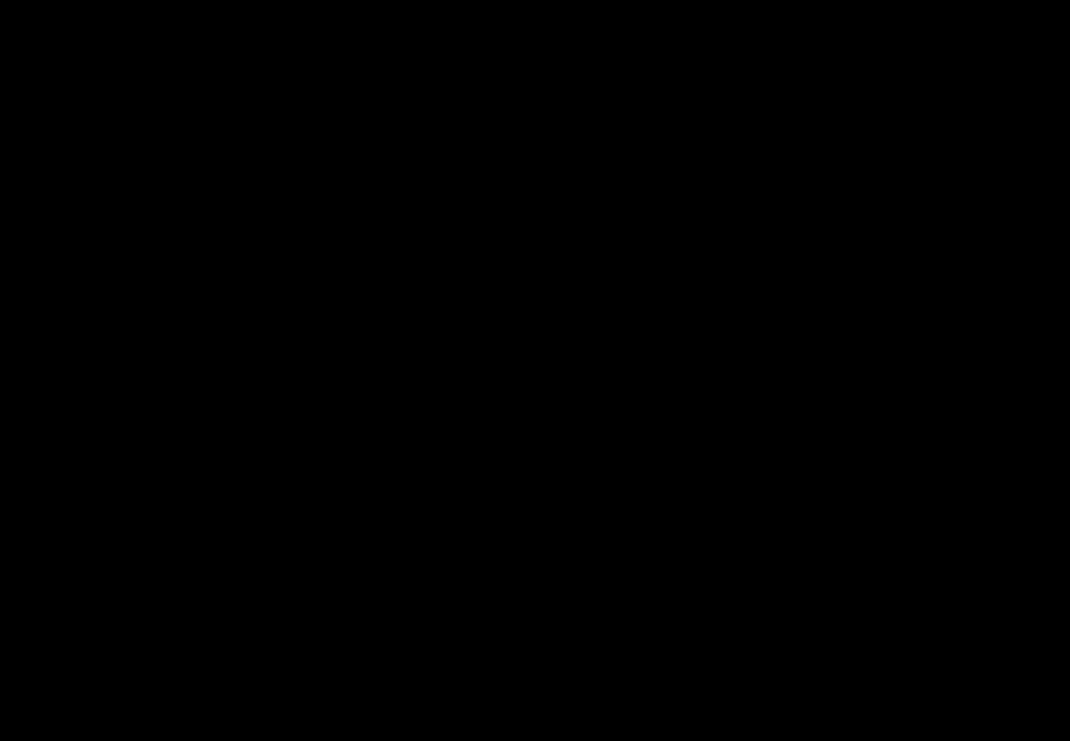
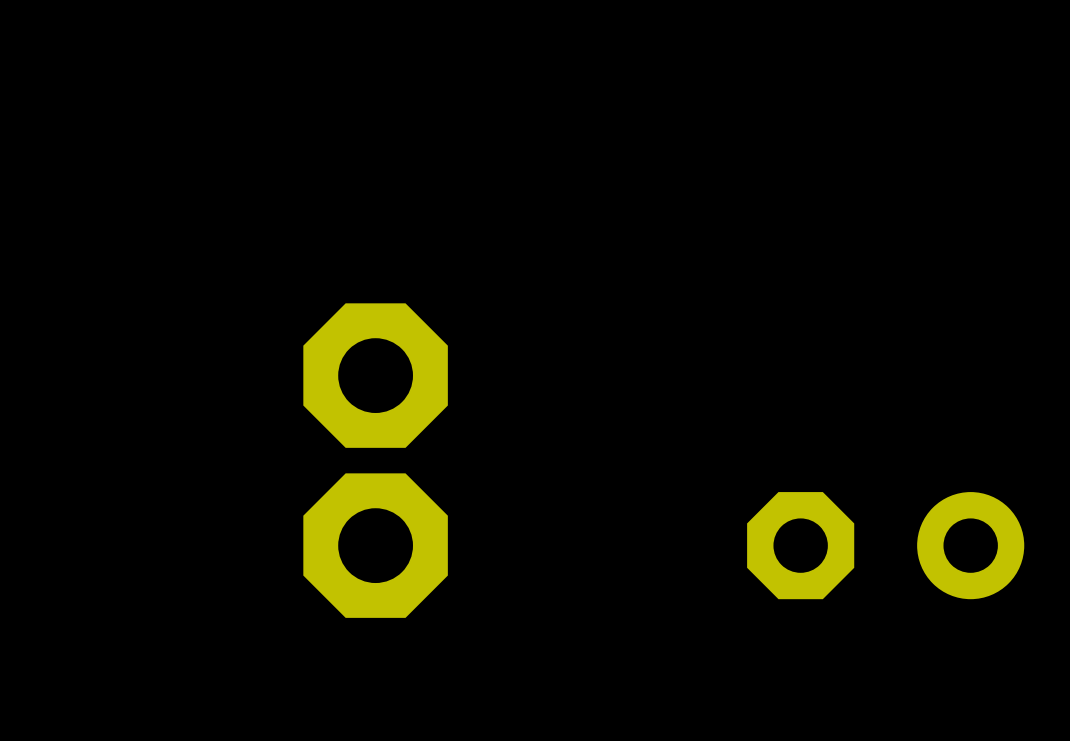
part: none -> (375, 375)
part: none -> (375, 545)
part: none -> (885, 545)

